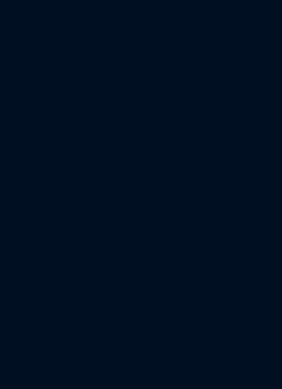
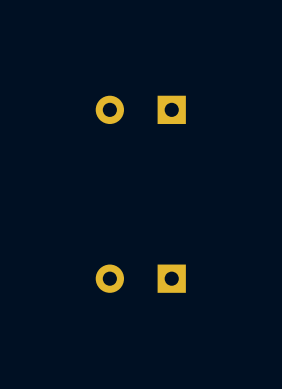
part: none -> (140, 109)
part: none -> (140, 278)

